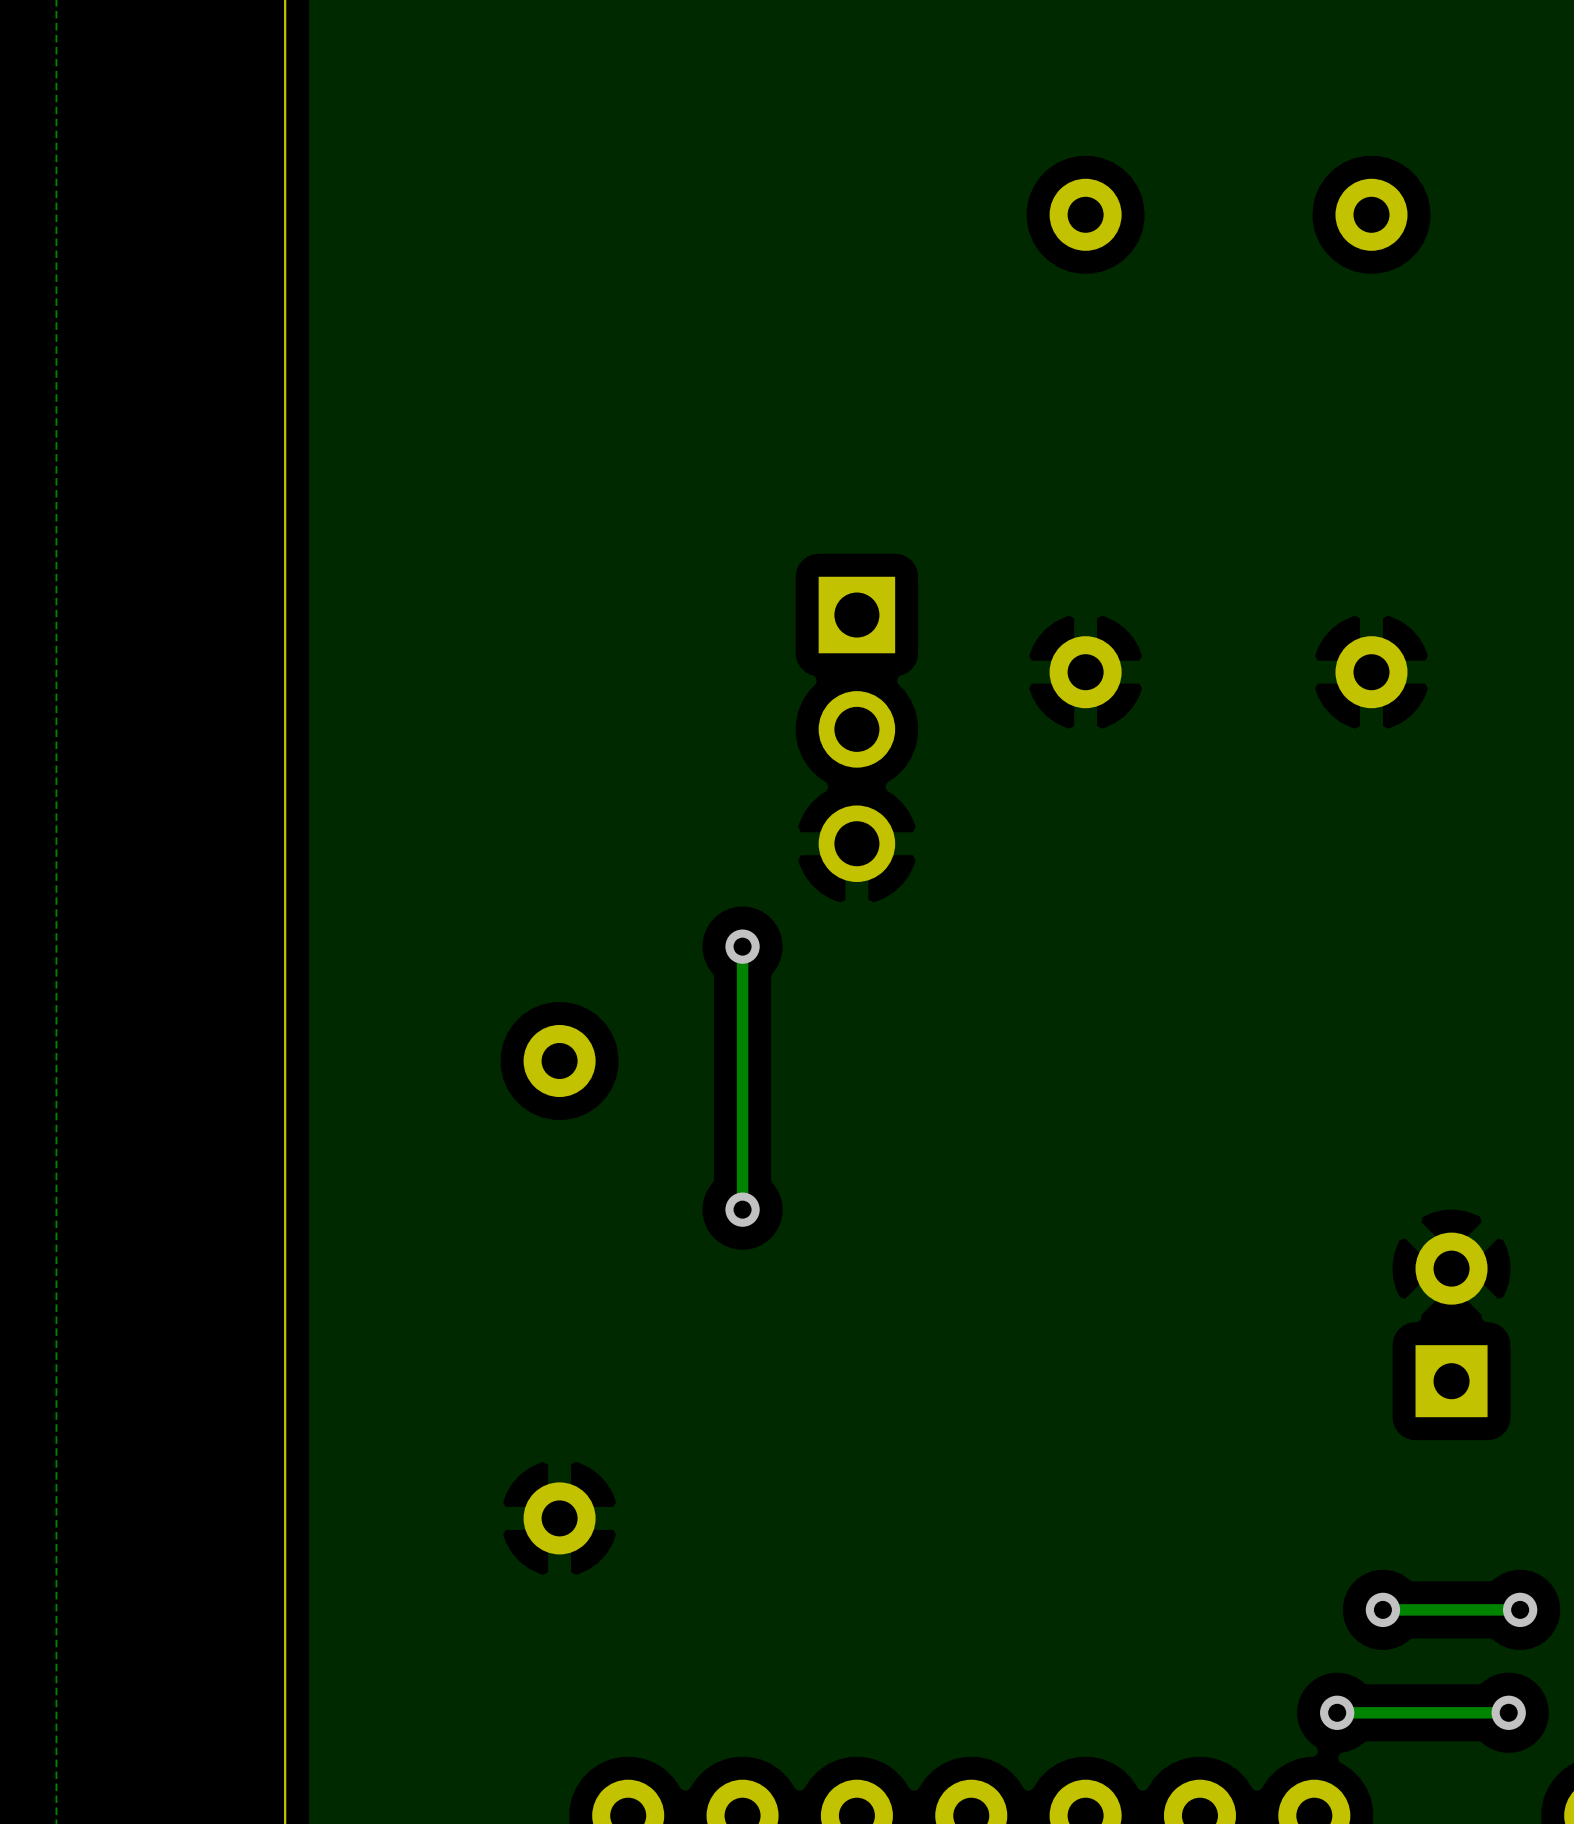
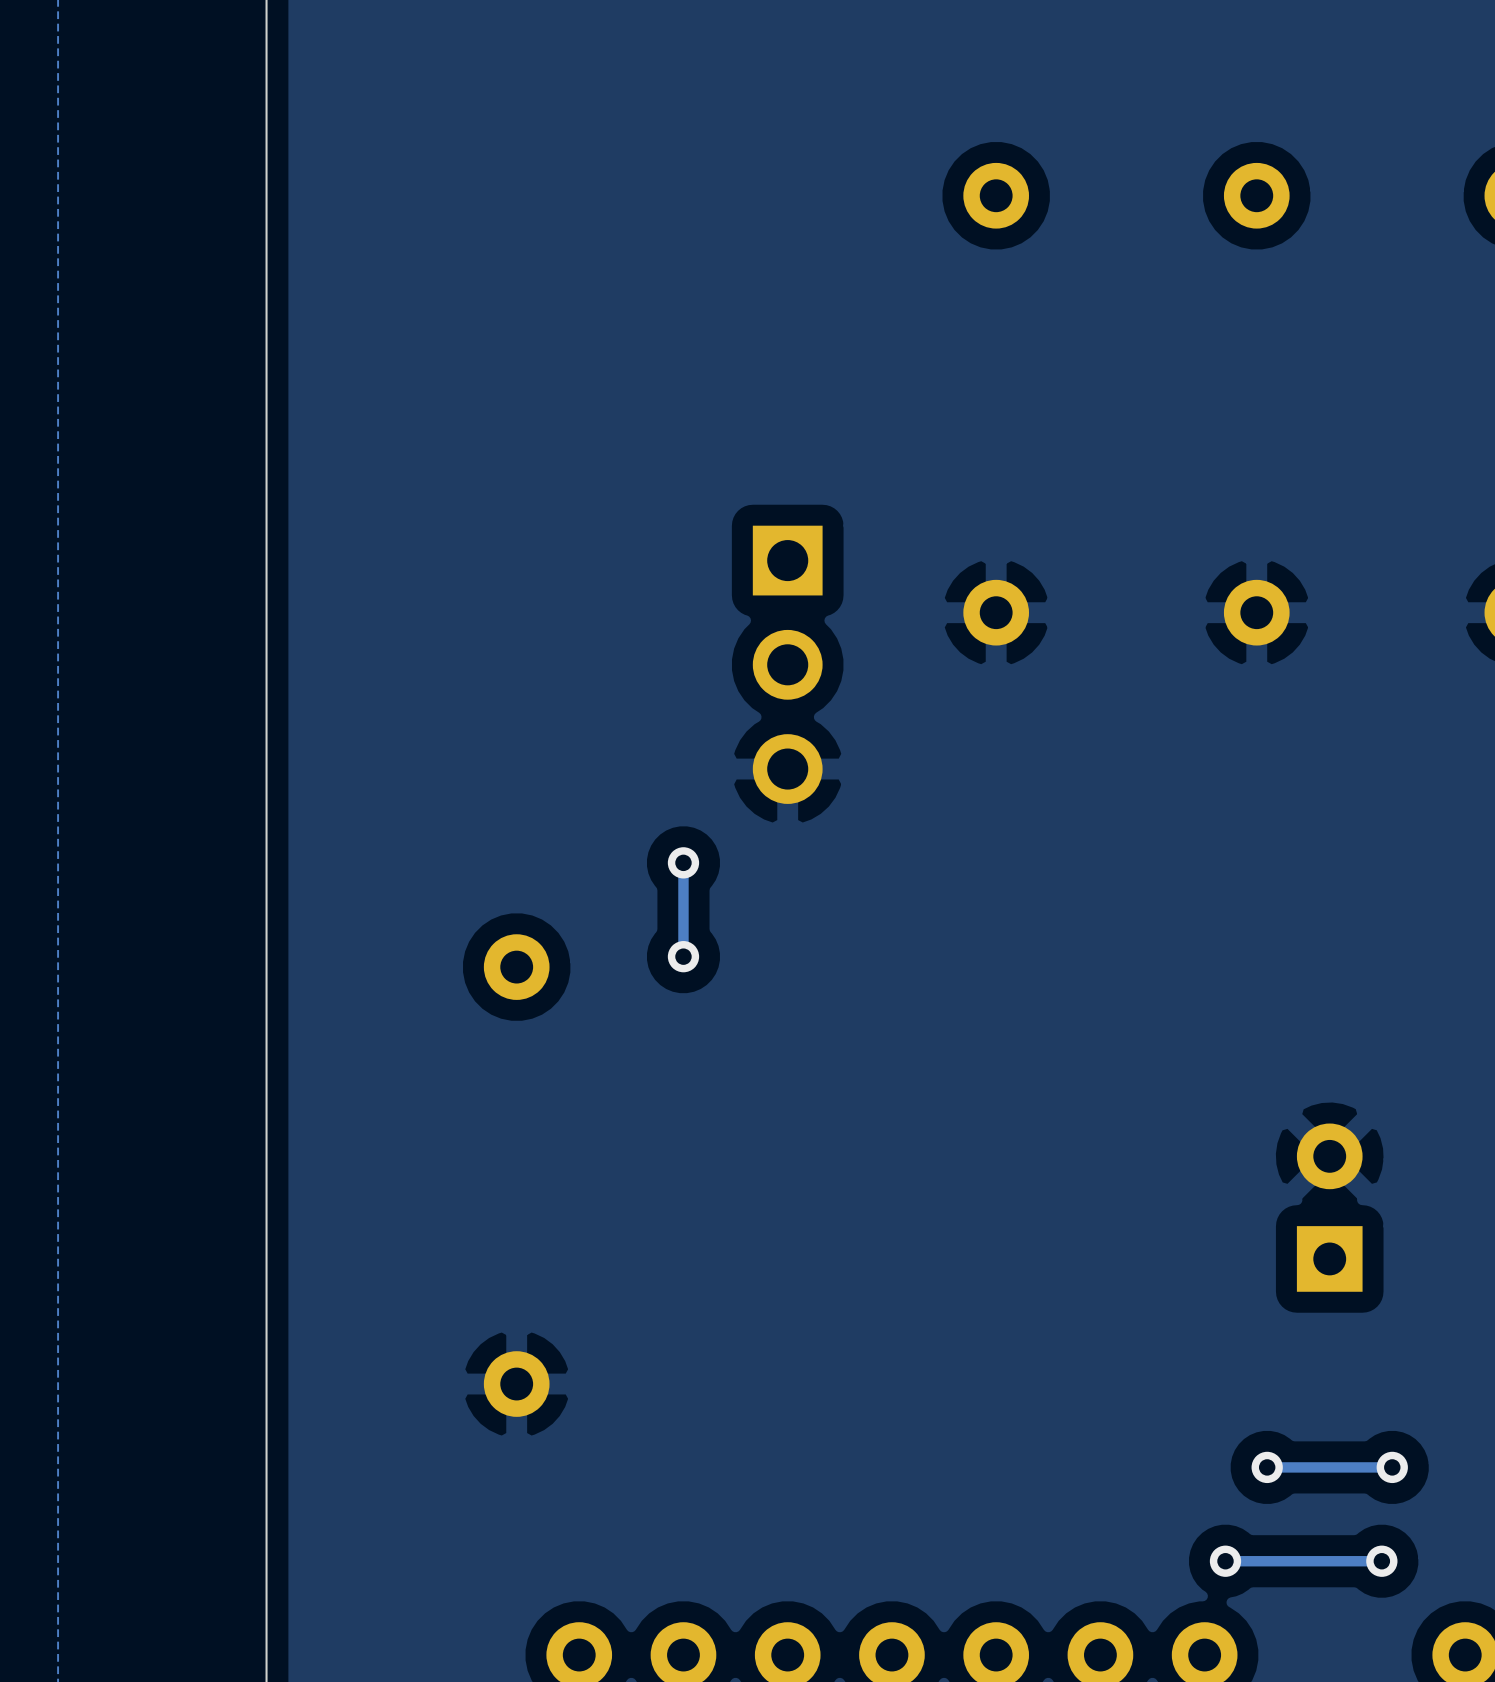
track: (742, 1049) (742, 1209) -> none
via position: (742, 1209) -> (683, 956)

